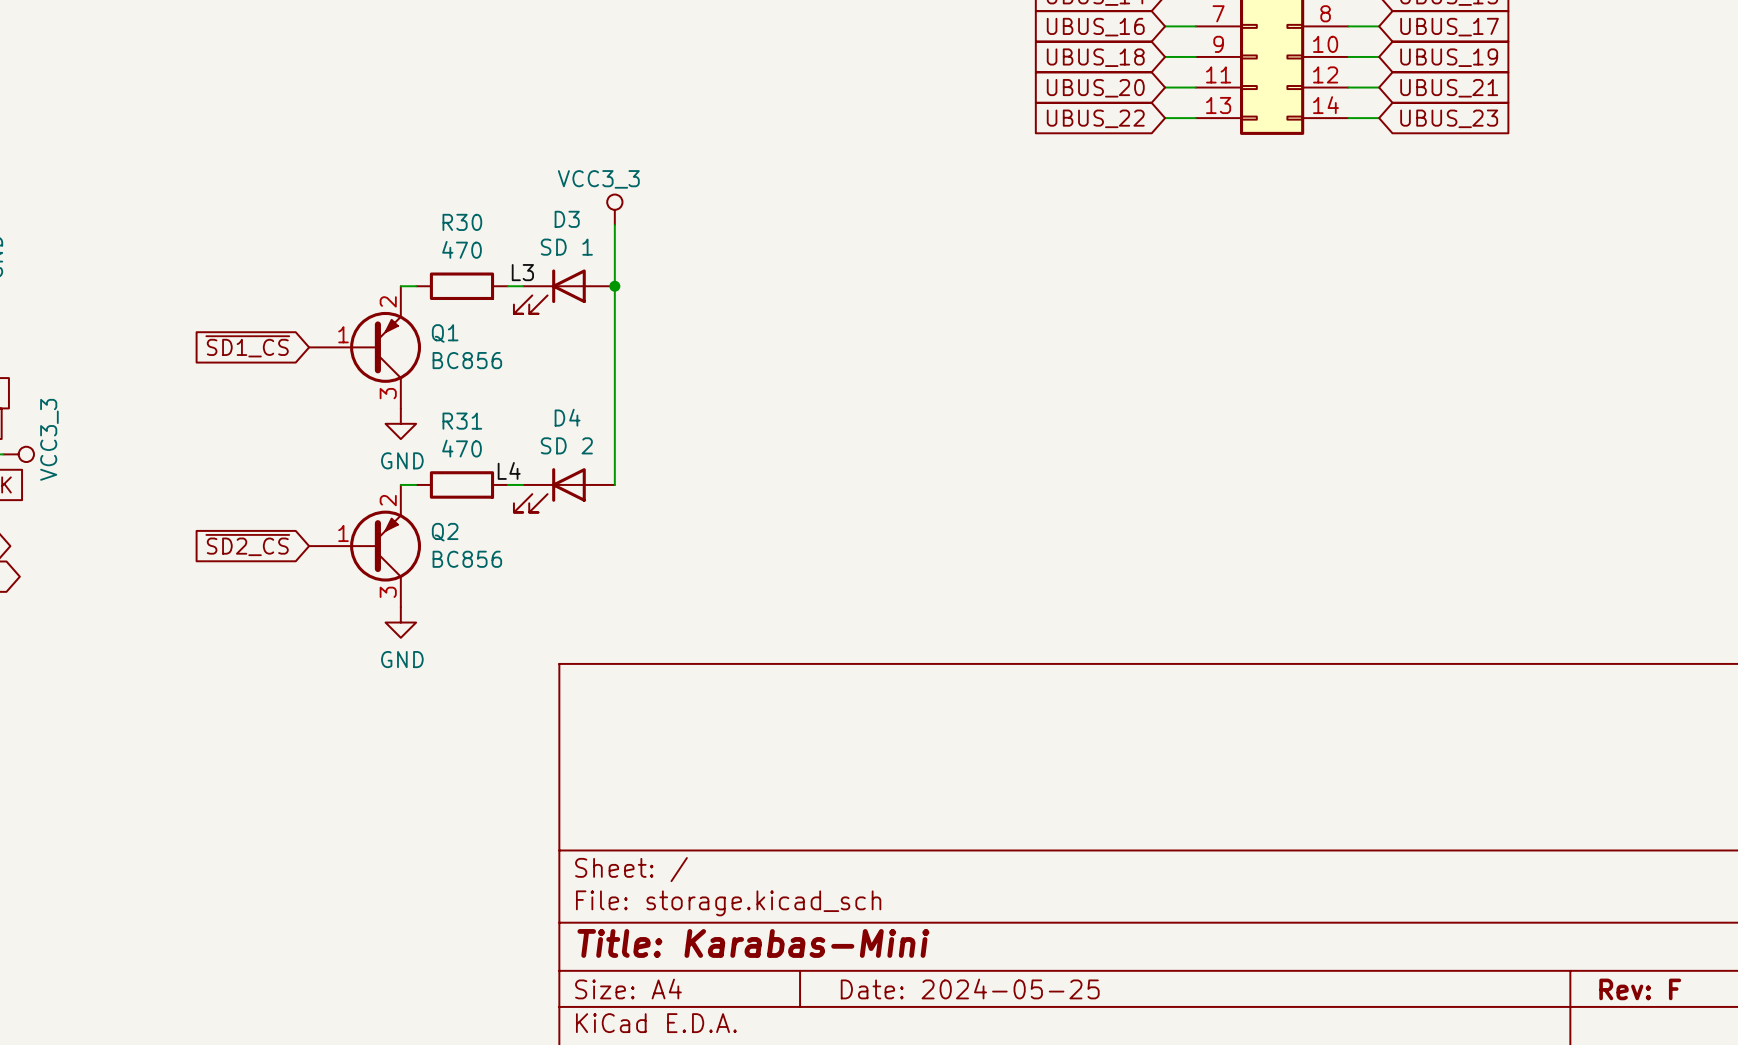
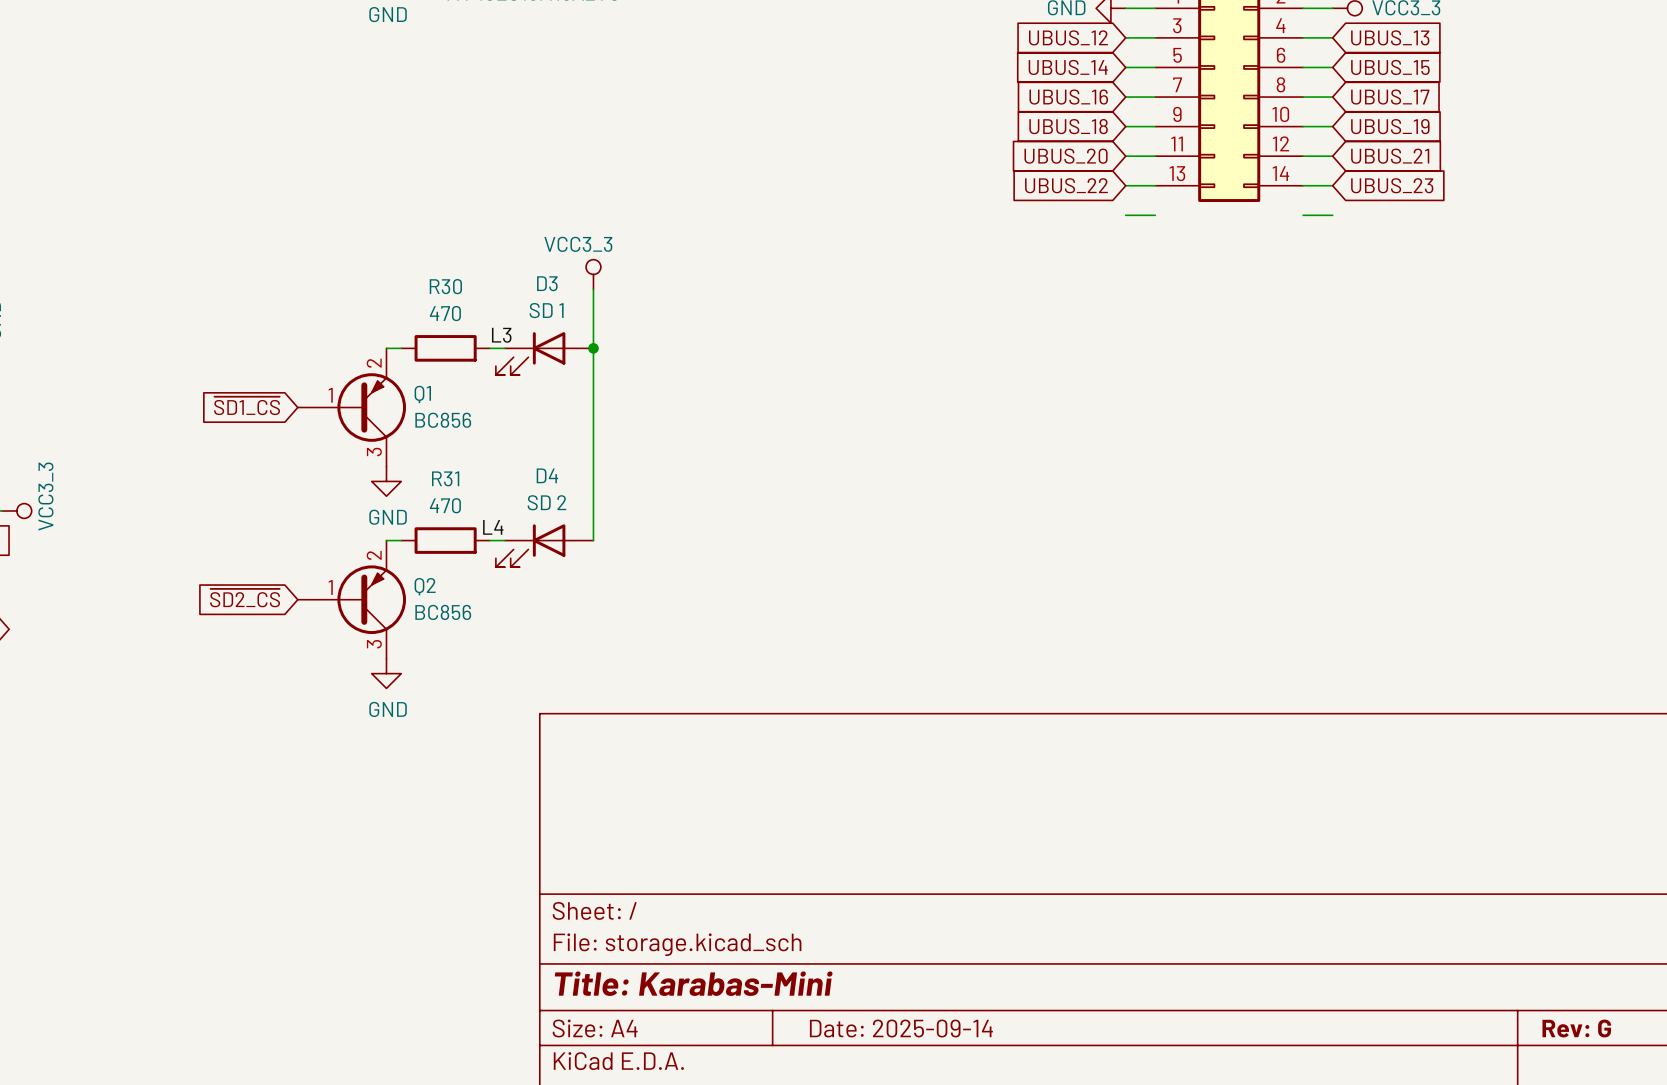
wire: none -> (1125, 215) (1155, 215)
wire: none -> (1303, 215) (1332, 215)
title block: Date: 2024-05-25 (970, 988) -> Date: 2025-09-14 (901, 1028)
title block: Rev: F (1640, 989) -> Rev: G (1576, 1028)

